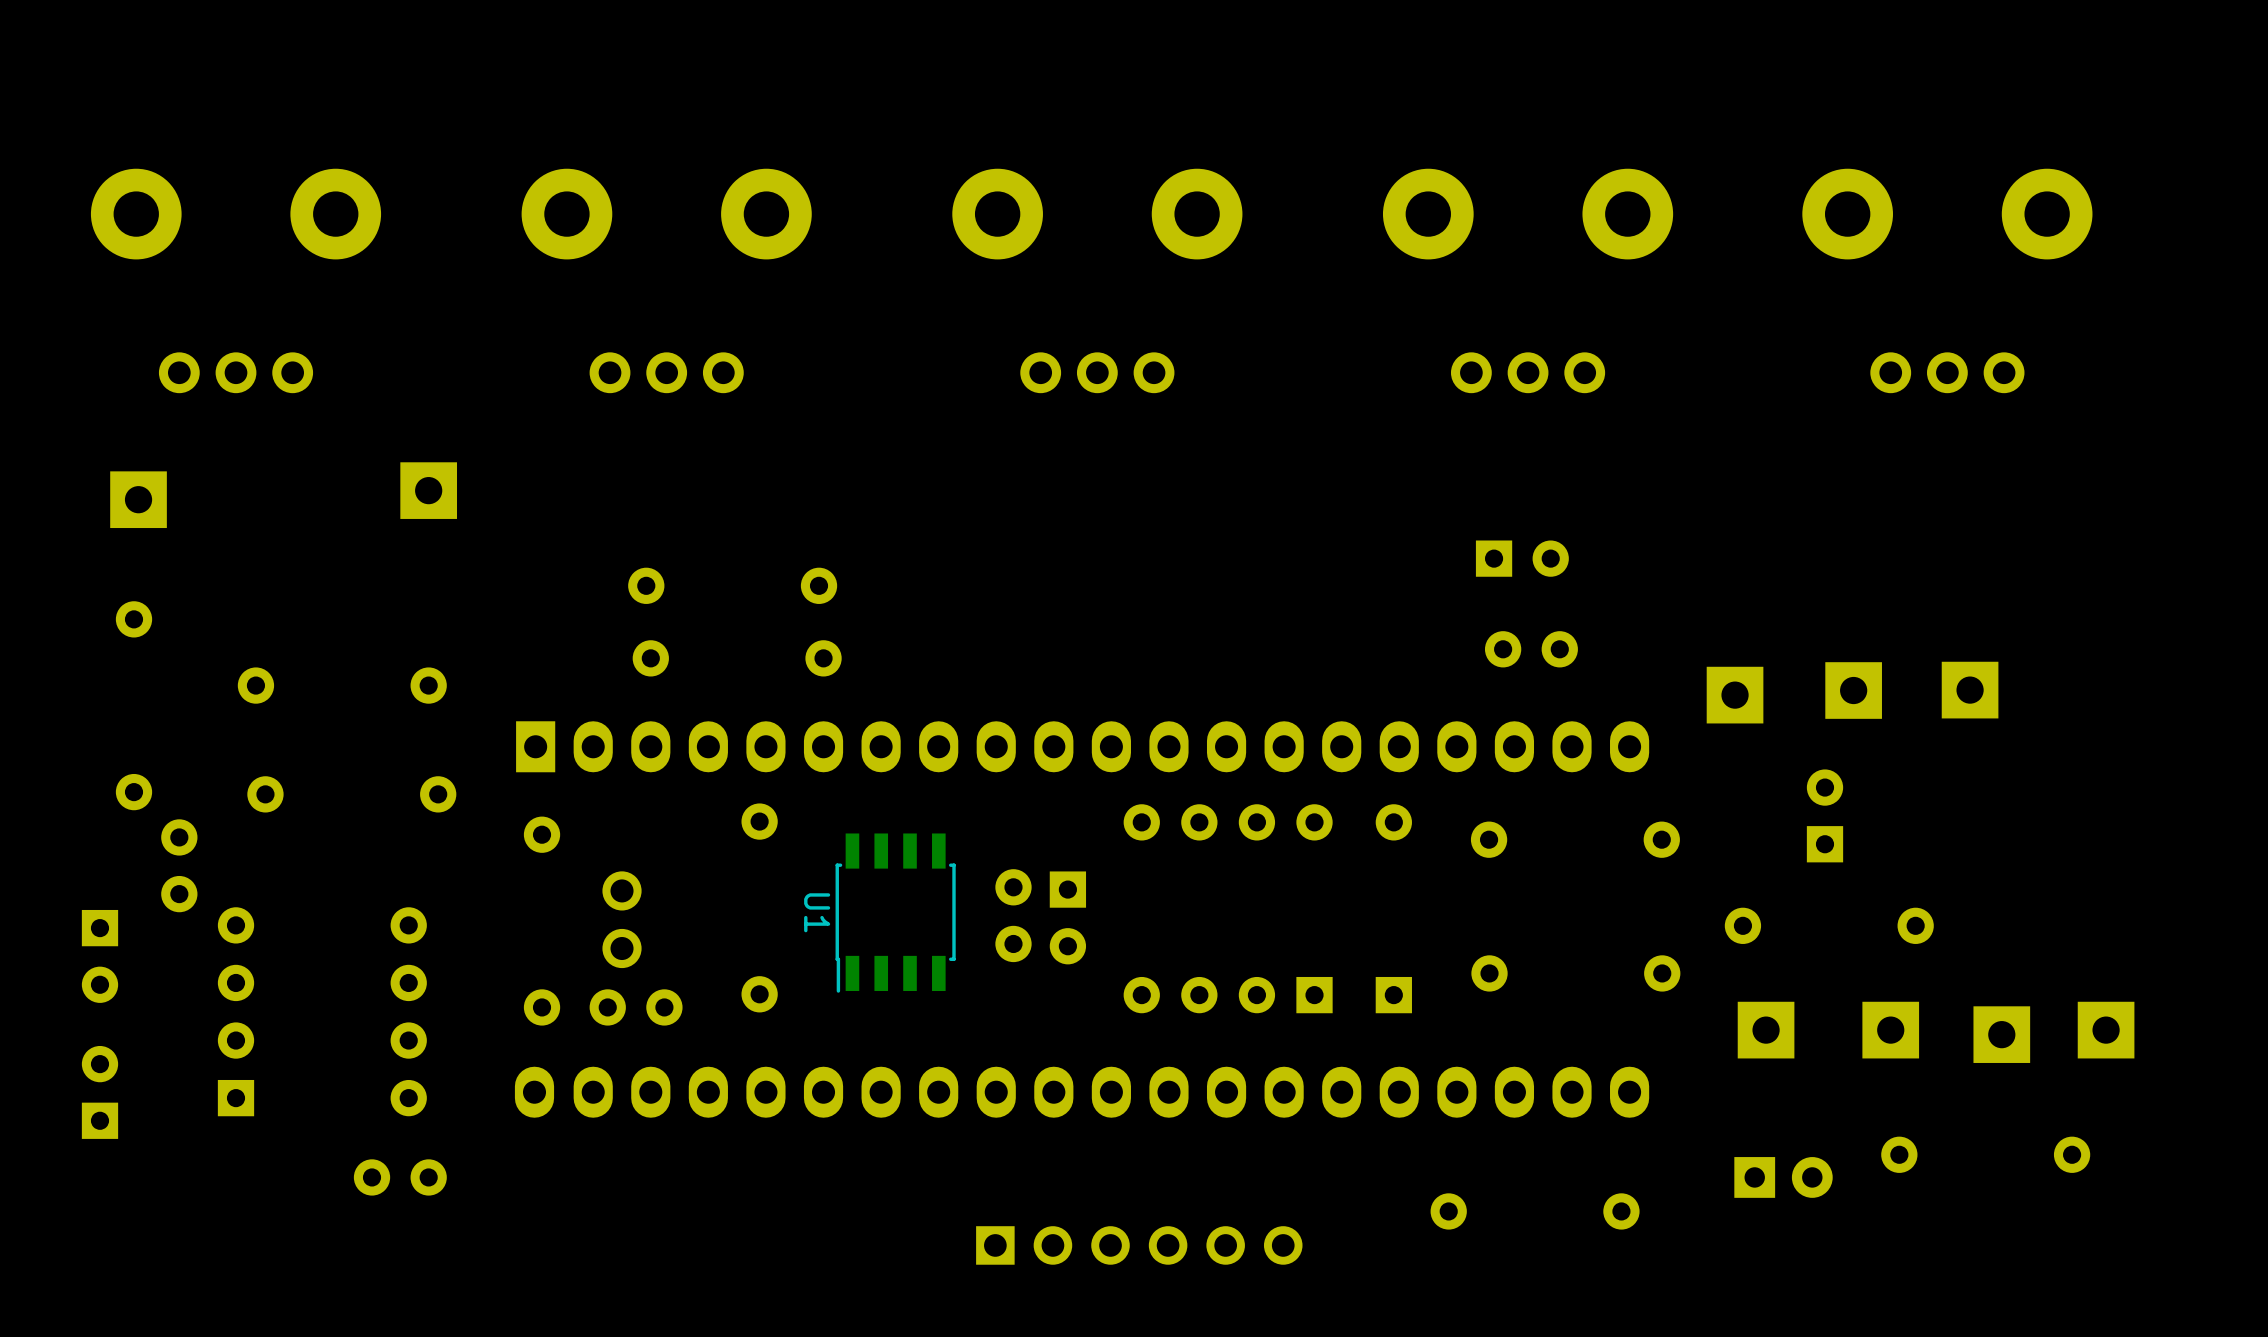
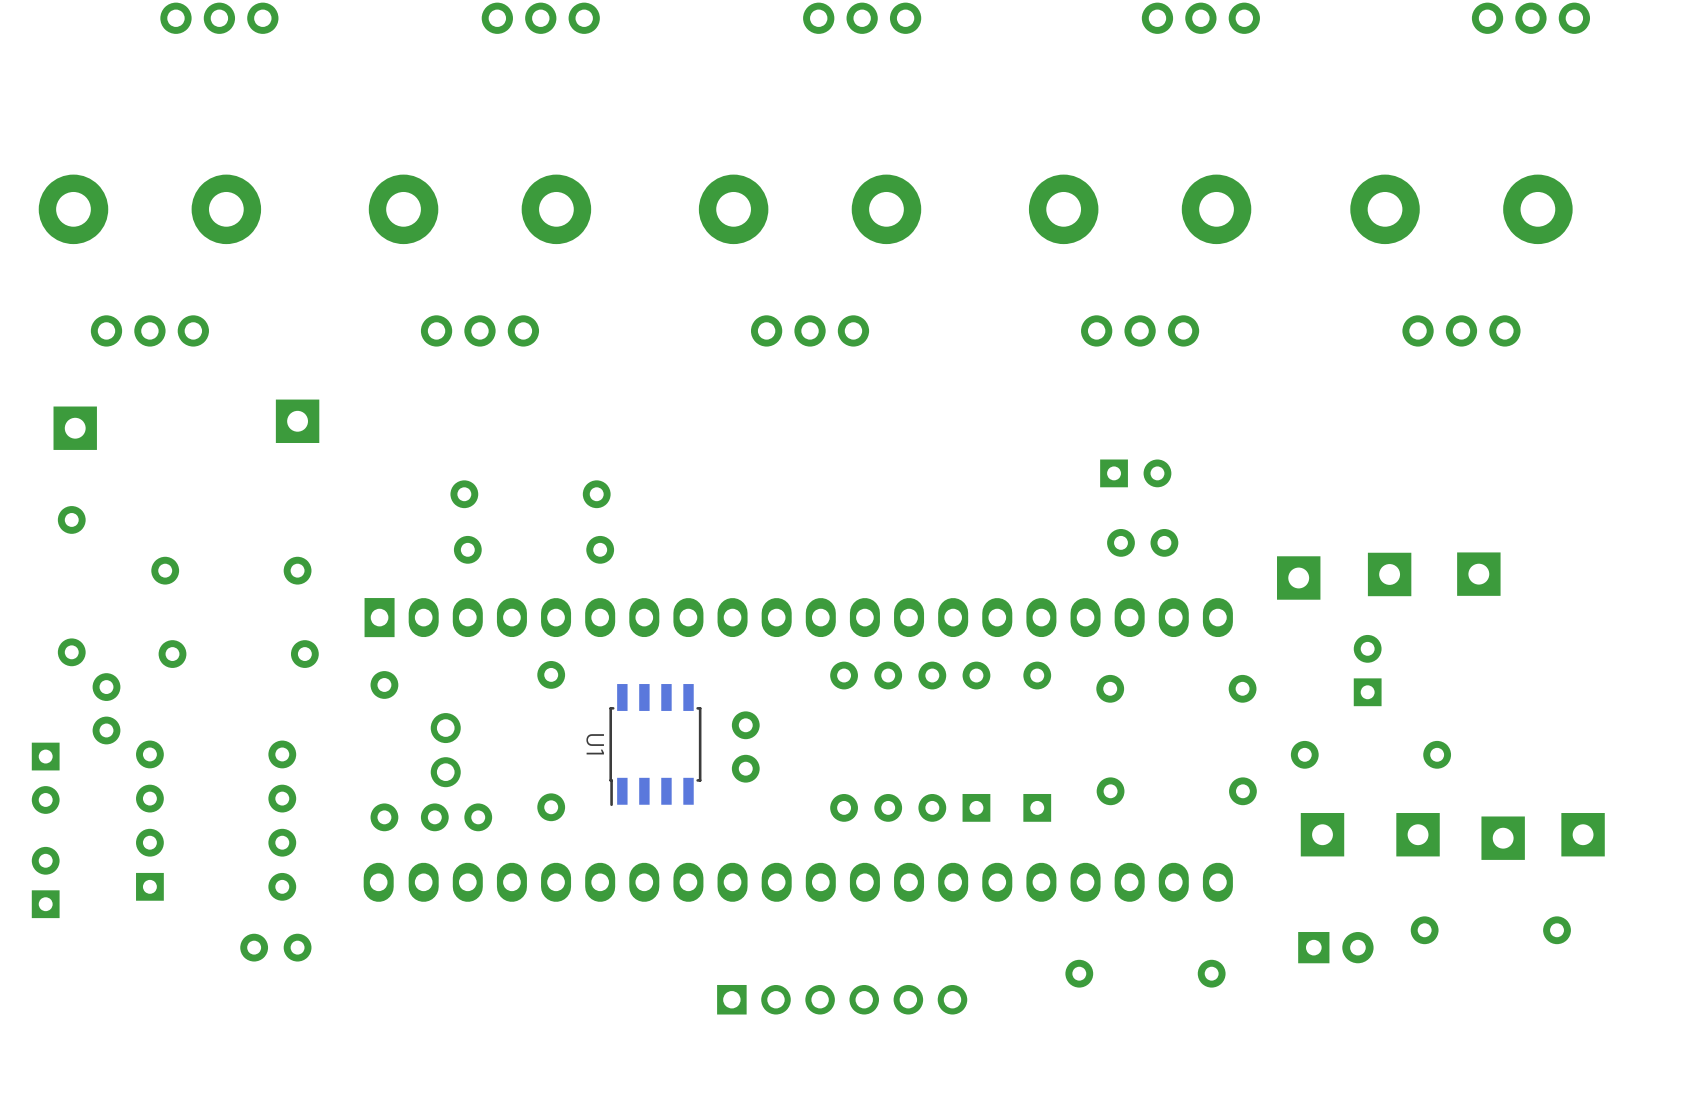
part: (1067, 917) -> none

